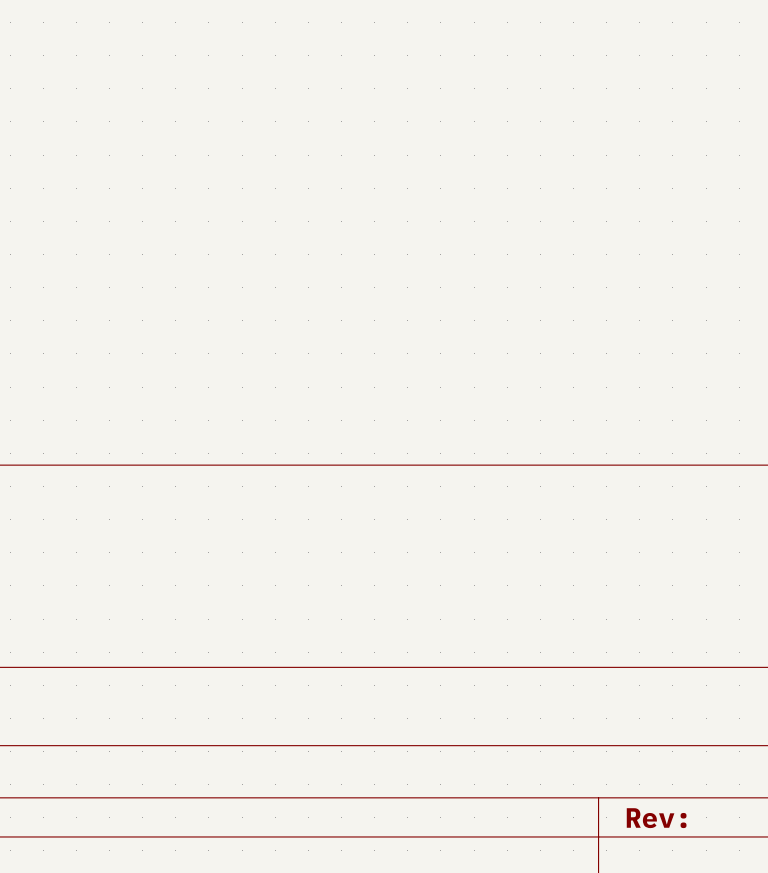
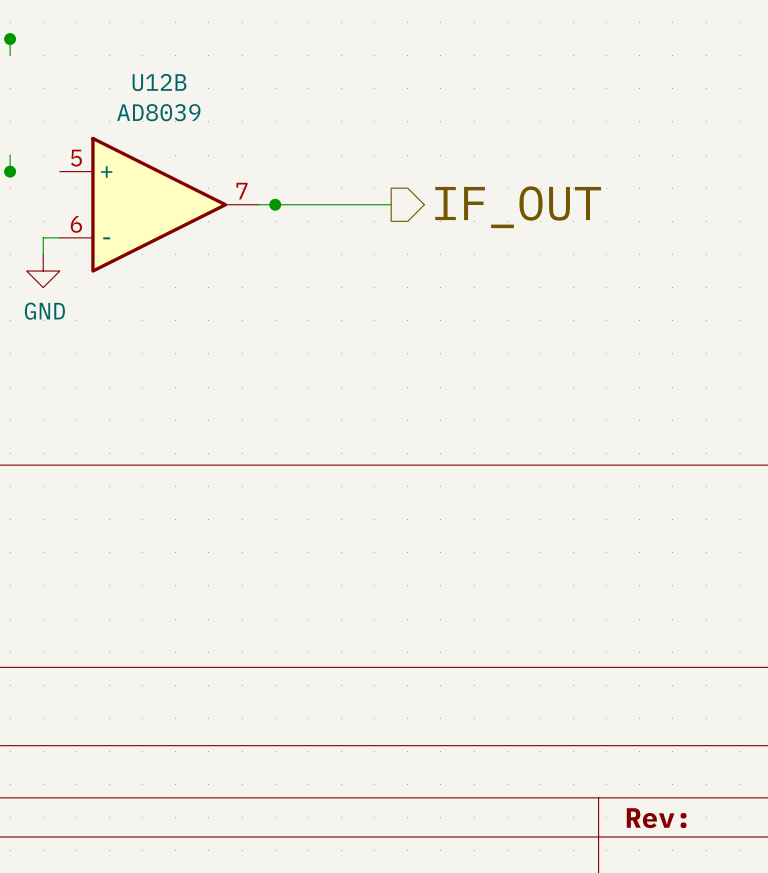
wire: none -> (10, 39) (10, 55)
junction: none -> (10, 39)
wire: none -> (10, 155) (10, 171)
junction: none -> (10, 171)
U12B: none -> AD8039 (159, 204)
wire: none -> (258, 204) (391, 204)
junction: none -> (275, 204)
hierarchical label: none -> IF_OUT (518, 207)
wire: none -> (59, 237) (43, 237) (43, 254)
power symbol: none -> GND (43, 271)

